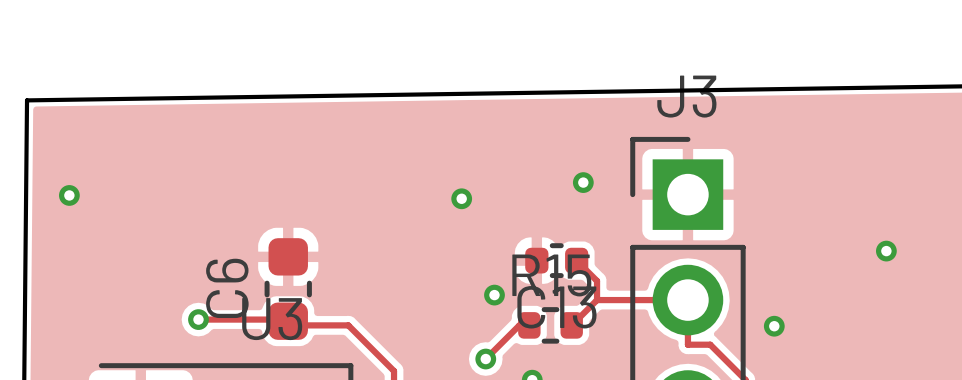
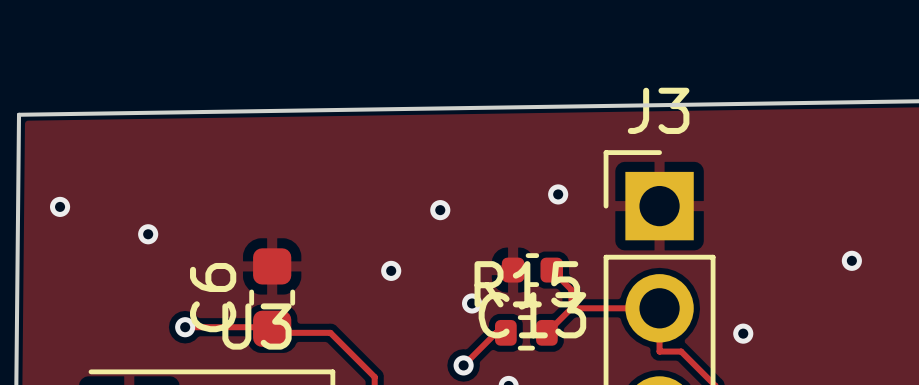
via: none -> (148, 234)
via: none -> (391, 270)

